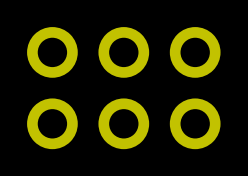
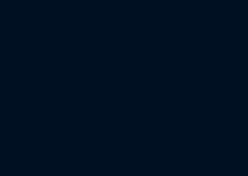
part: (52, 52) -> none
part: (123, 52) -> none
part: (195, 52) -> none
part: (52, 123) -> none
part: (123, 123) -> none
part: (195, 123) -> none

